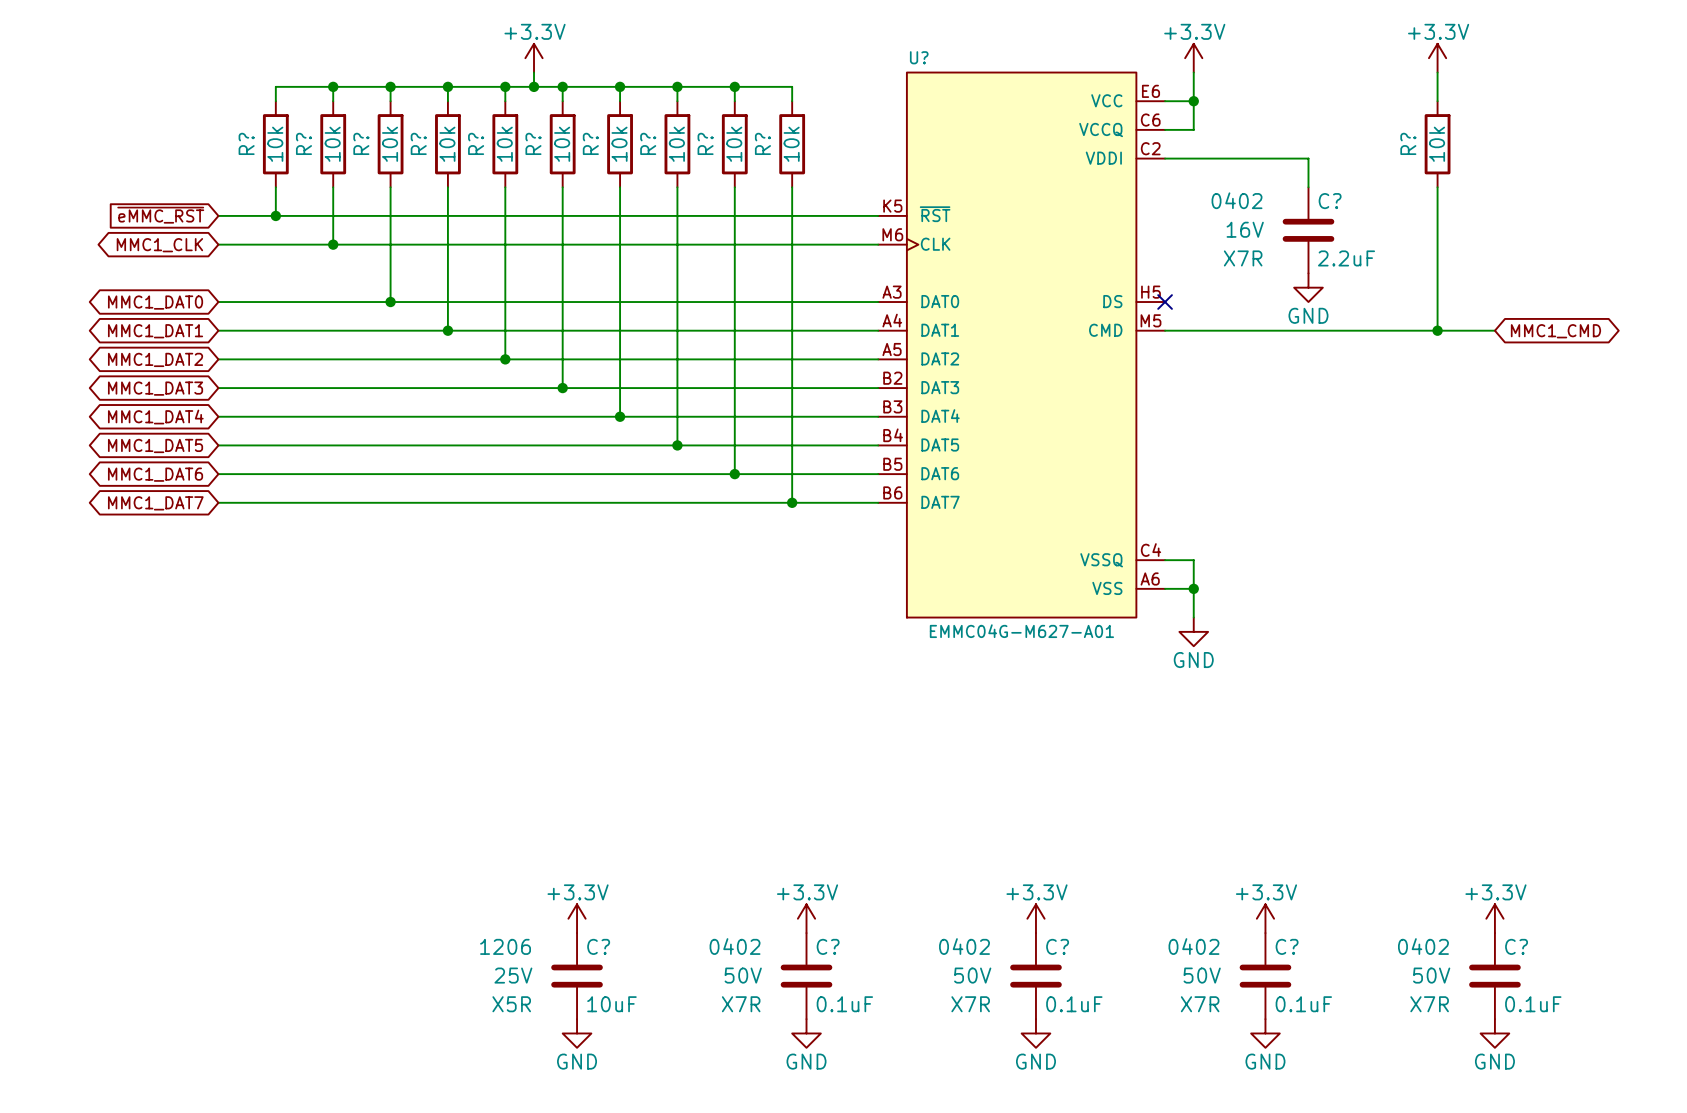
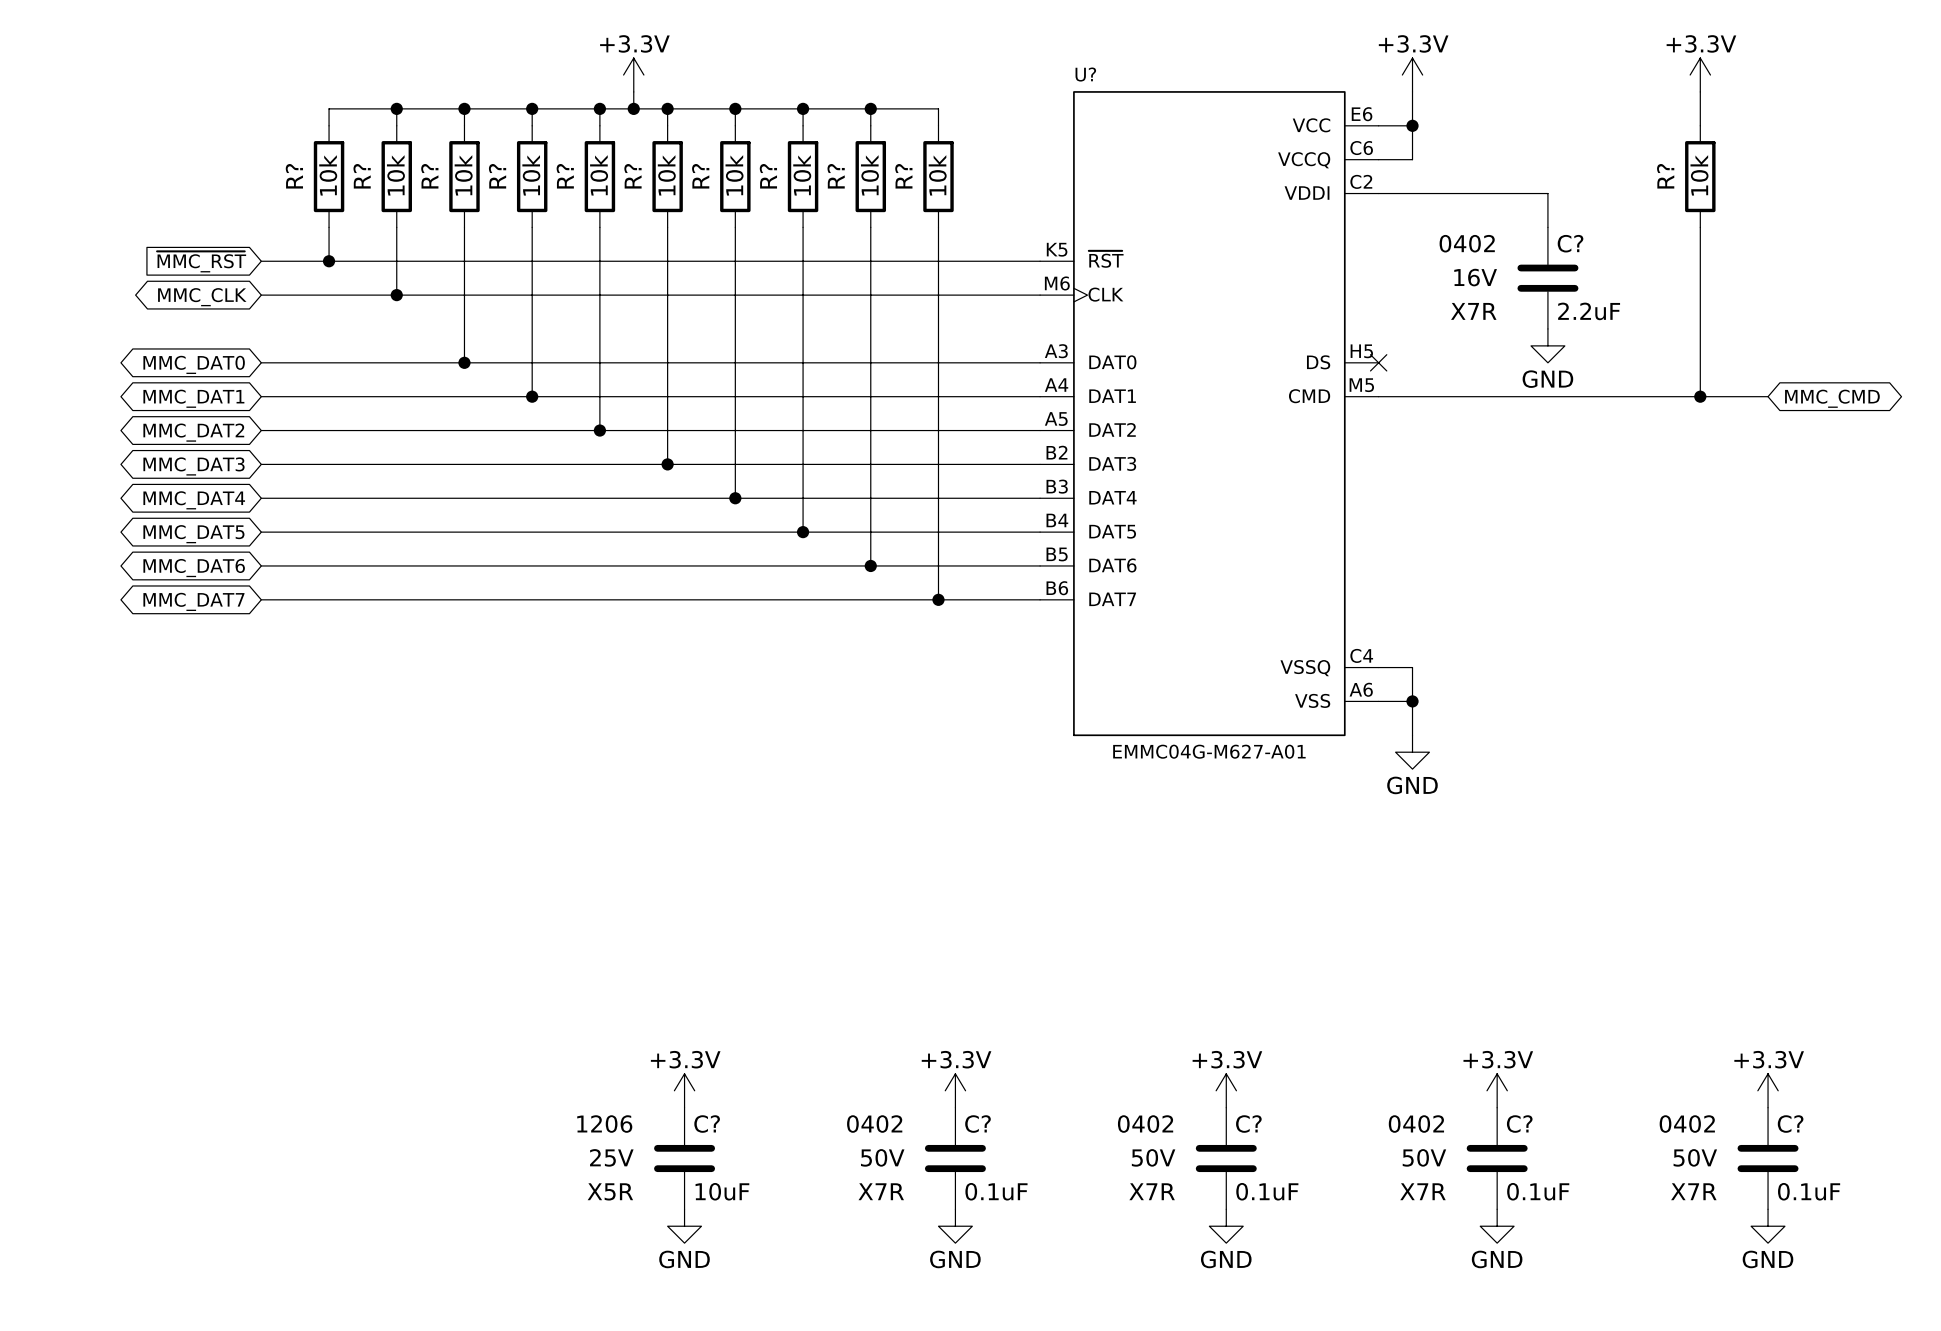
global label: ~{eMMC_RST} (160, 215) -> ~{MMC_RST} (201, 261)
global label: MMC1_CLK (159, 245) -> MMC_CLK (202, 297)
global label: MMC1_DAT0 (155, 302) -> MMC_DAT0 (194, 364)
global label: MMC1_DAT1 (155, 331) -> MMC_DAT1 (193, 398)
global label: MMC1_CMD (1555, 331) -> MMC_CMD (1832, 398)
global label: MMC1_DAT2 (155, 359) -> MMC_DAT2 (193, 432)
global label: MMC1_DAT3 (155, 388) -> MMC_DAT3 (194, 466)
global label: MMC1_DAT4 (155, 417) -> MMC_DAT4 (194, 500)
global label: MMC1_DAT5 (155, 445) -> MMC_DAT5 (193, 534)
global label: MMC1_DAT6 (155, 474) -> MMC_DAT6 (194, 568)
global label: MMC1_DAT7 (155, 503) -> MMC_DAT7 (193, 601)

